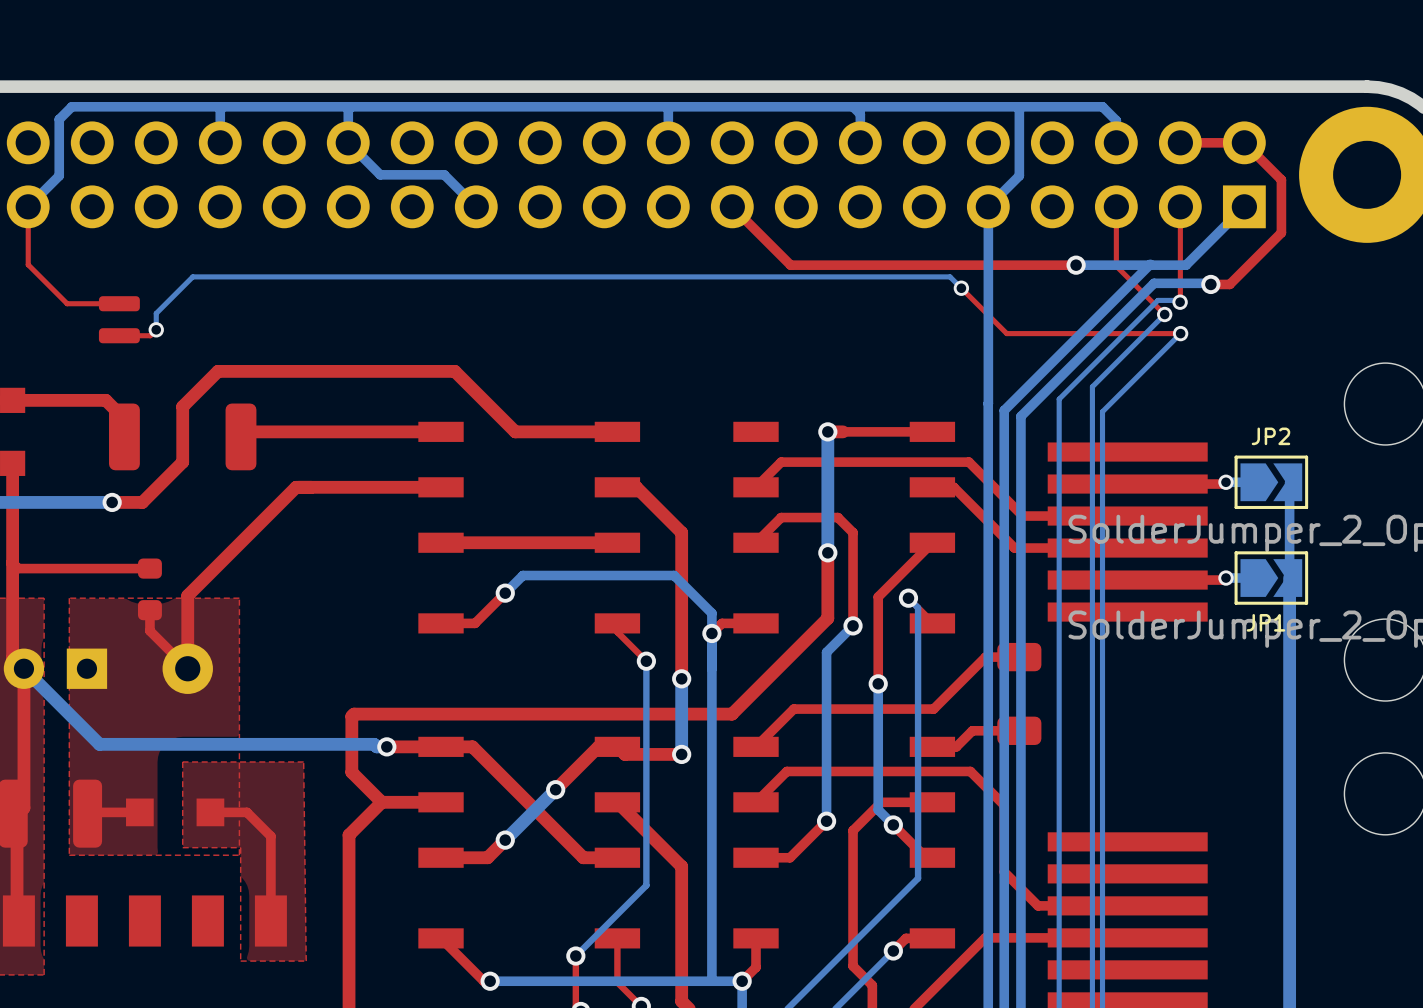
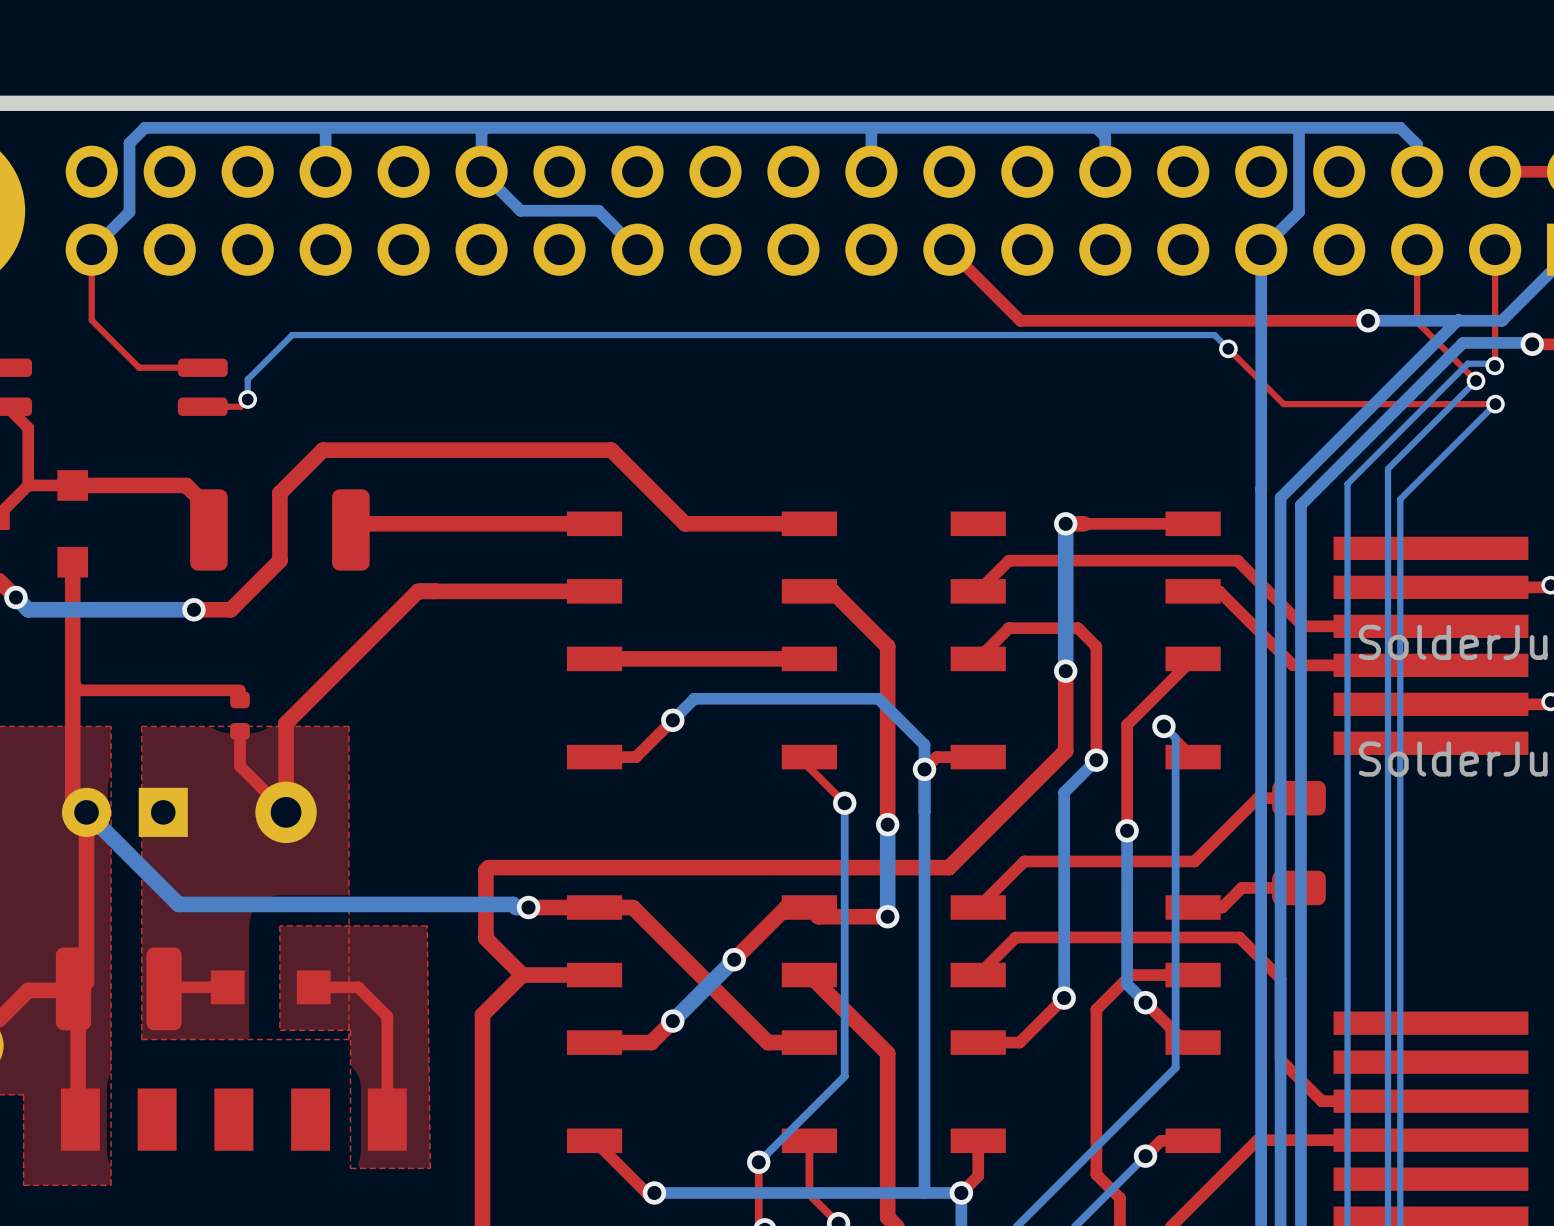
part footprint: [137, 558, 162, 621] -> [230, 691, 250, 740]

